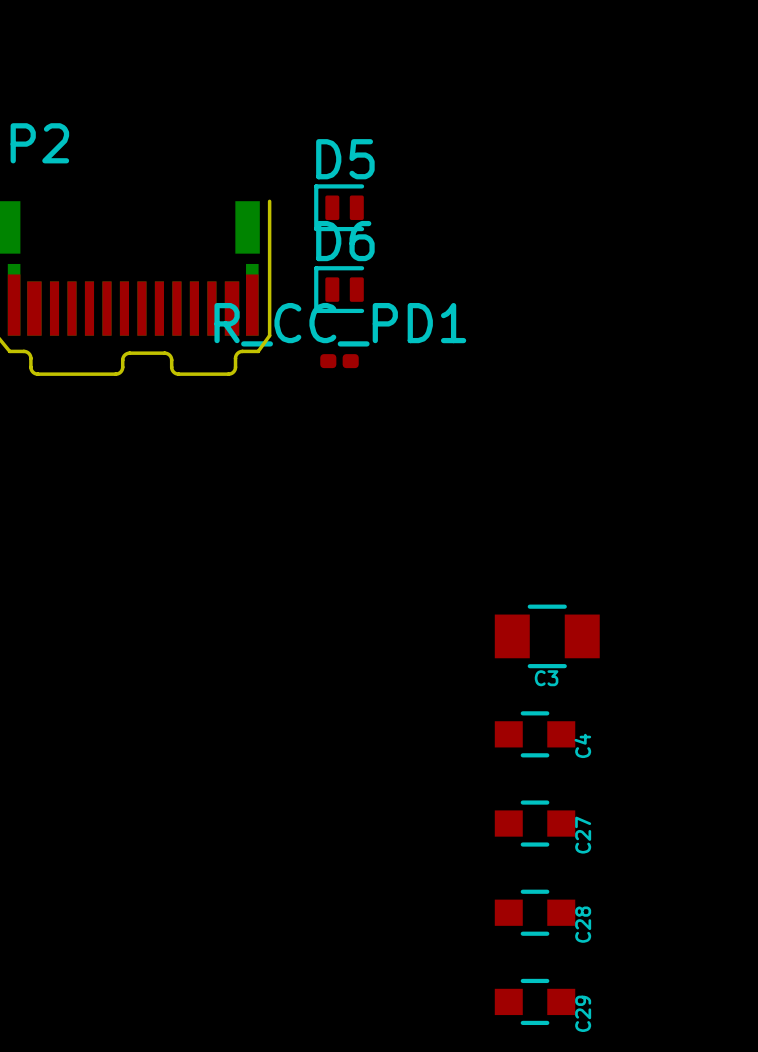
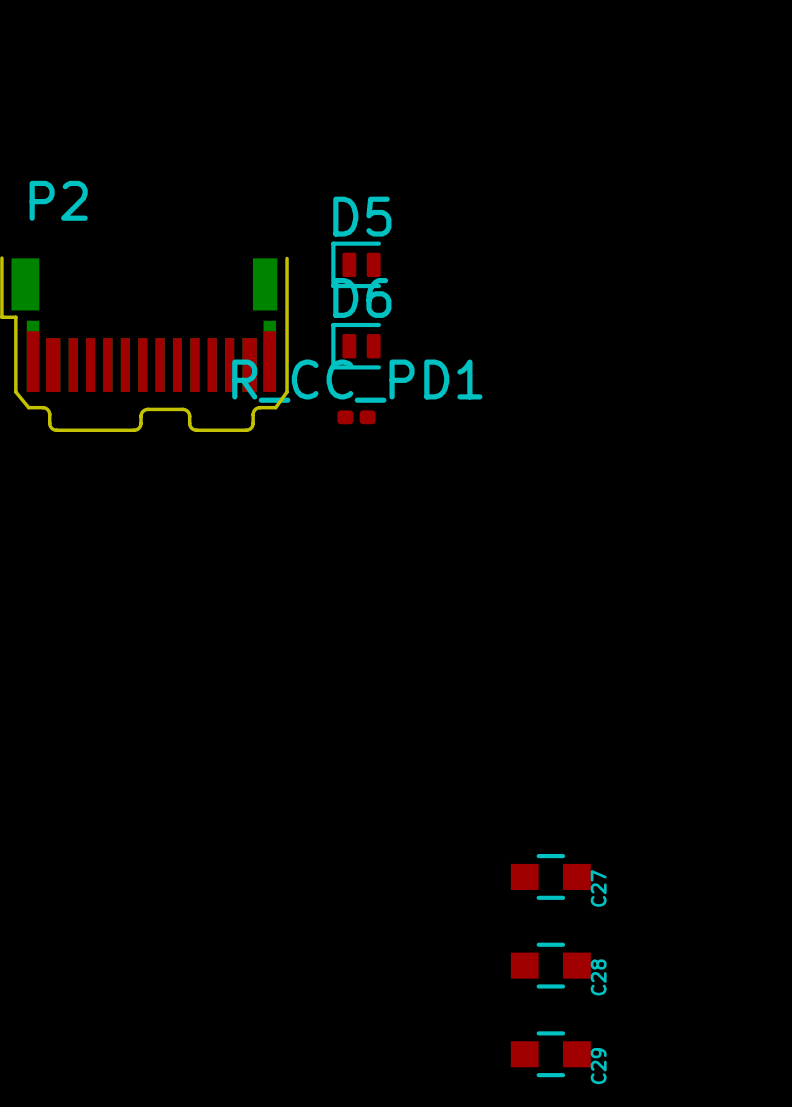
C3: (547, 636) -> none
C4: (535, 734) -> none

